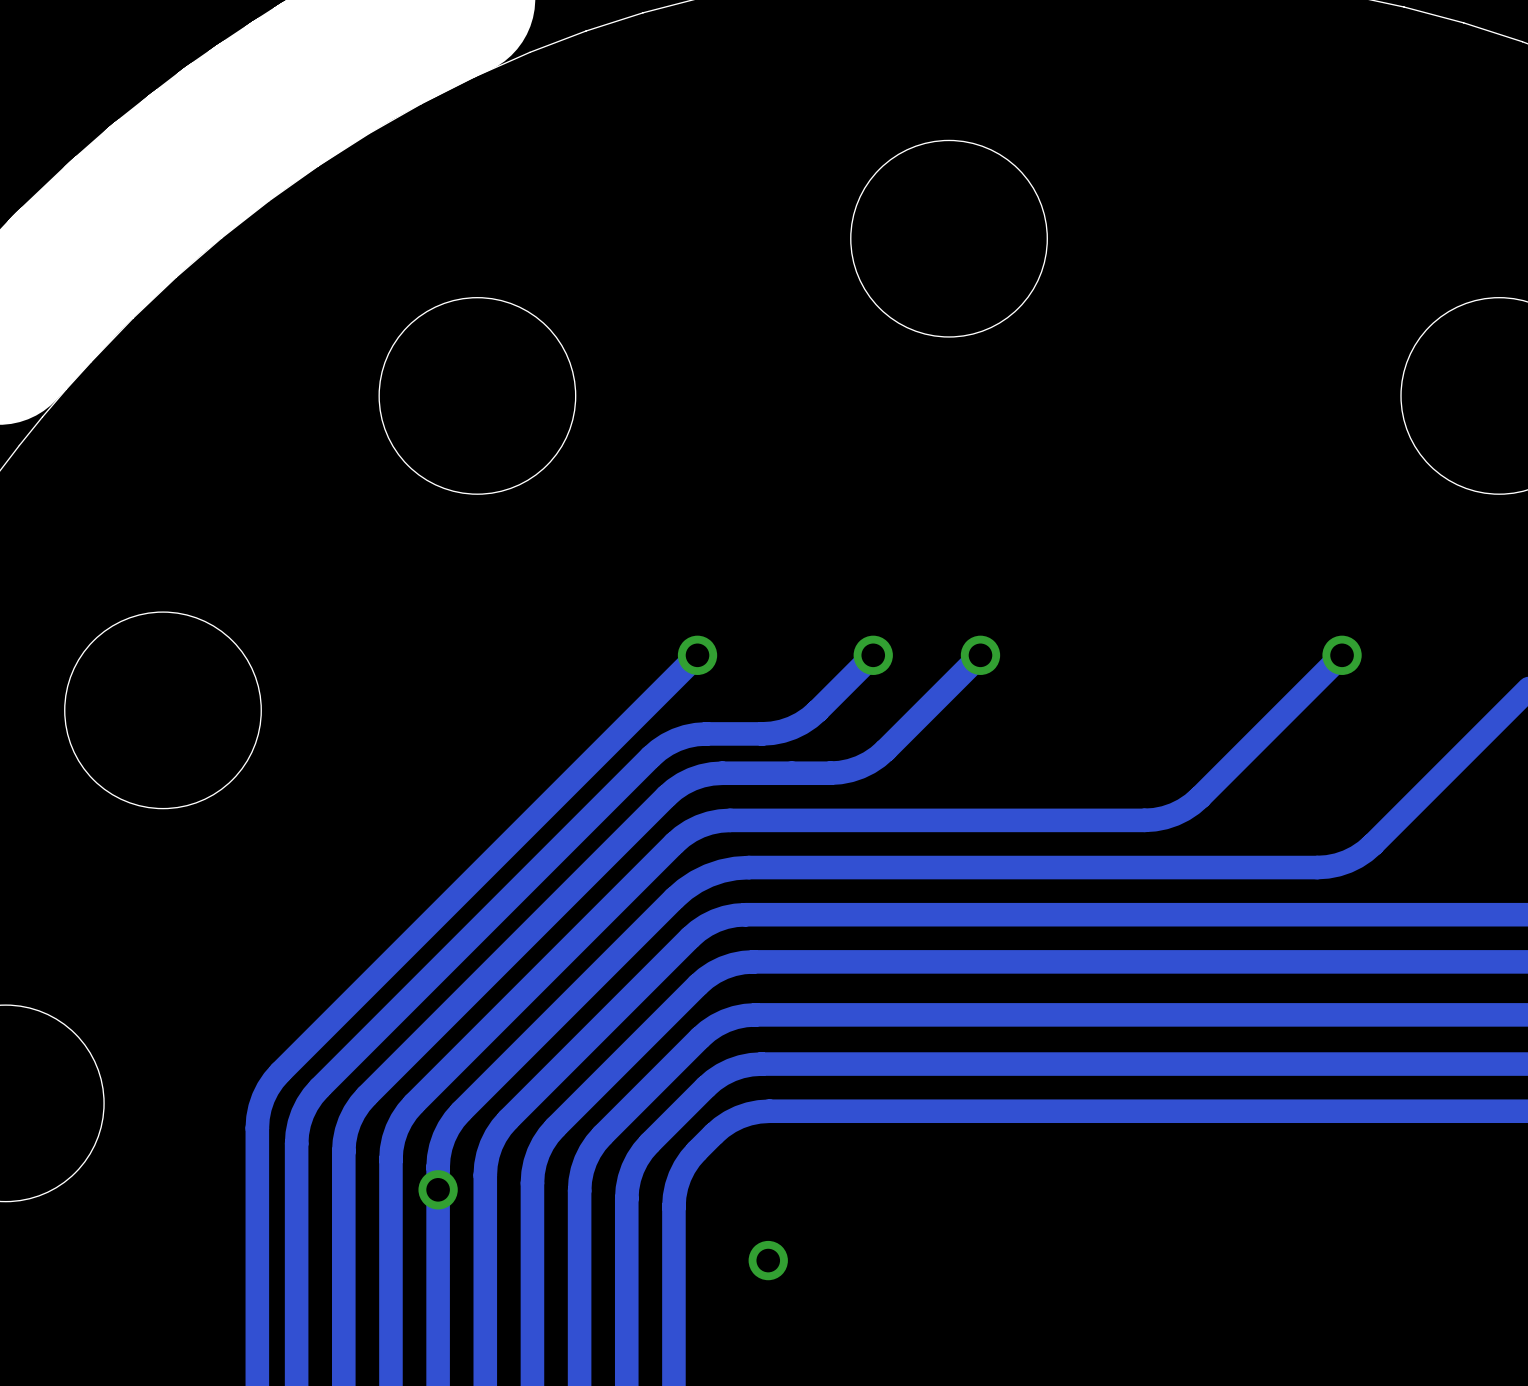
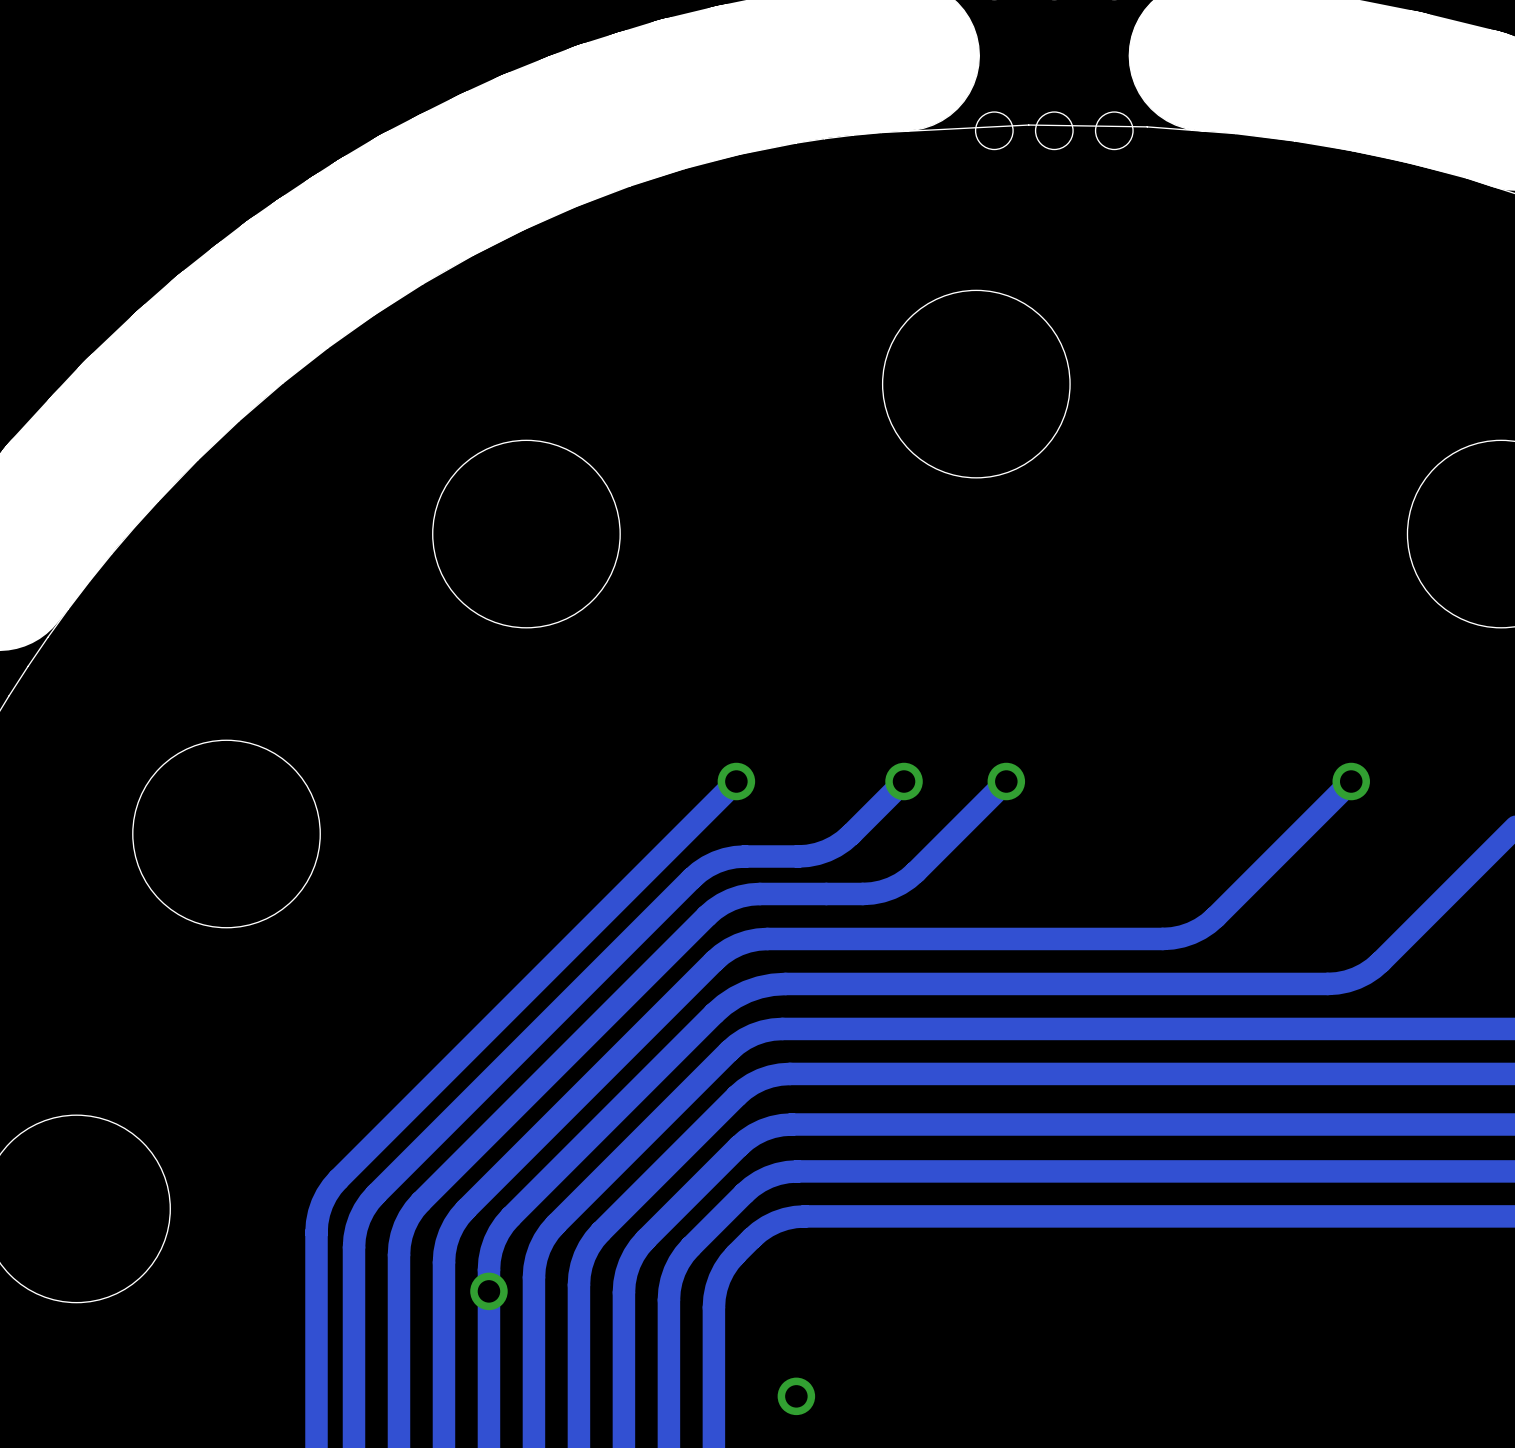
via position: (768, 1260) -> (796, 1396)

